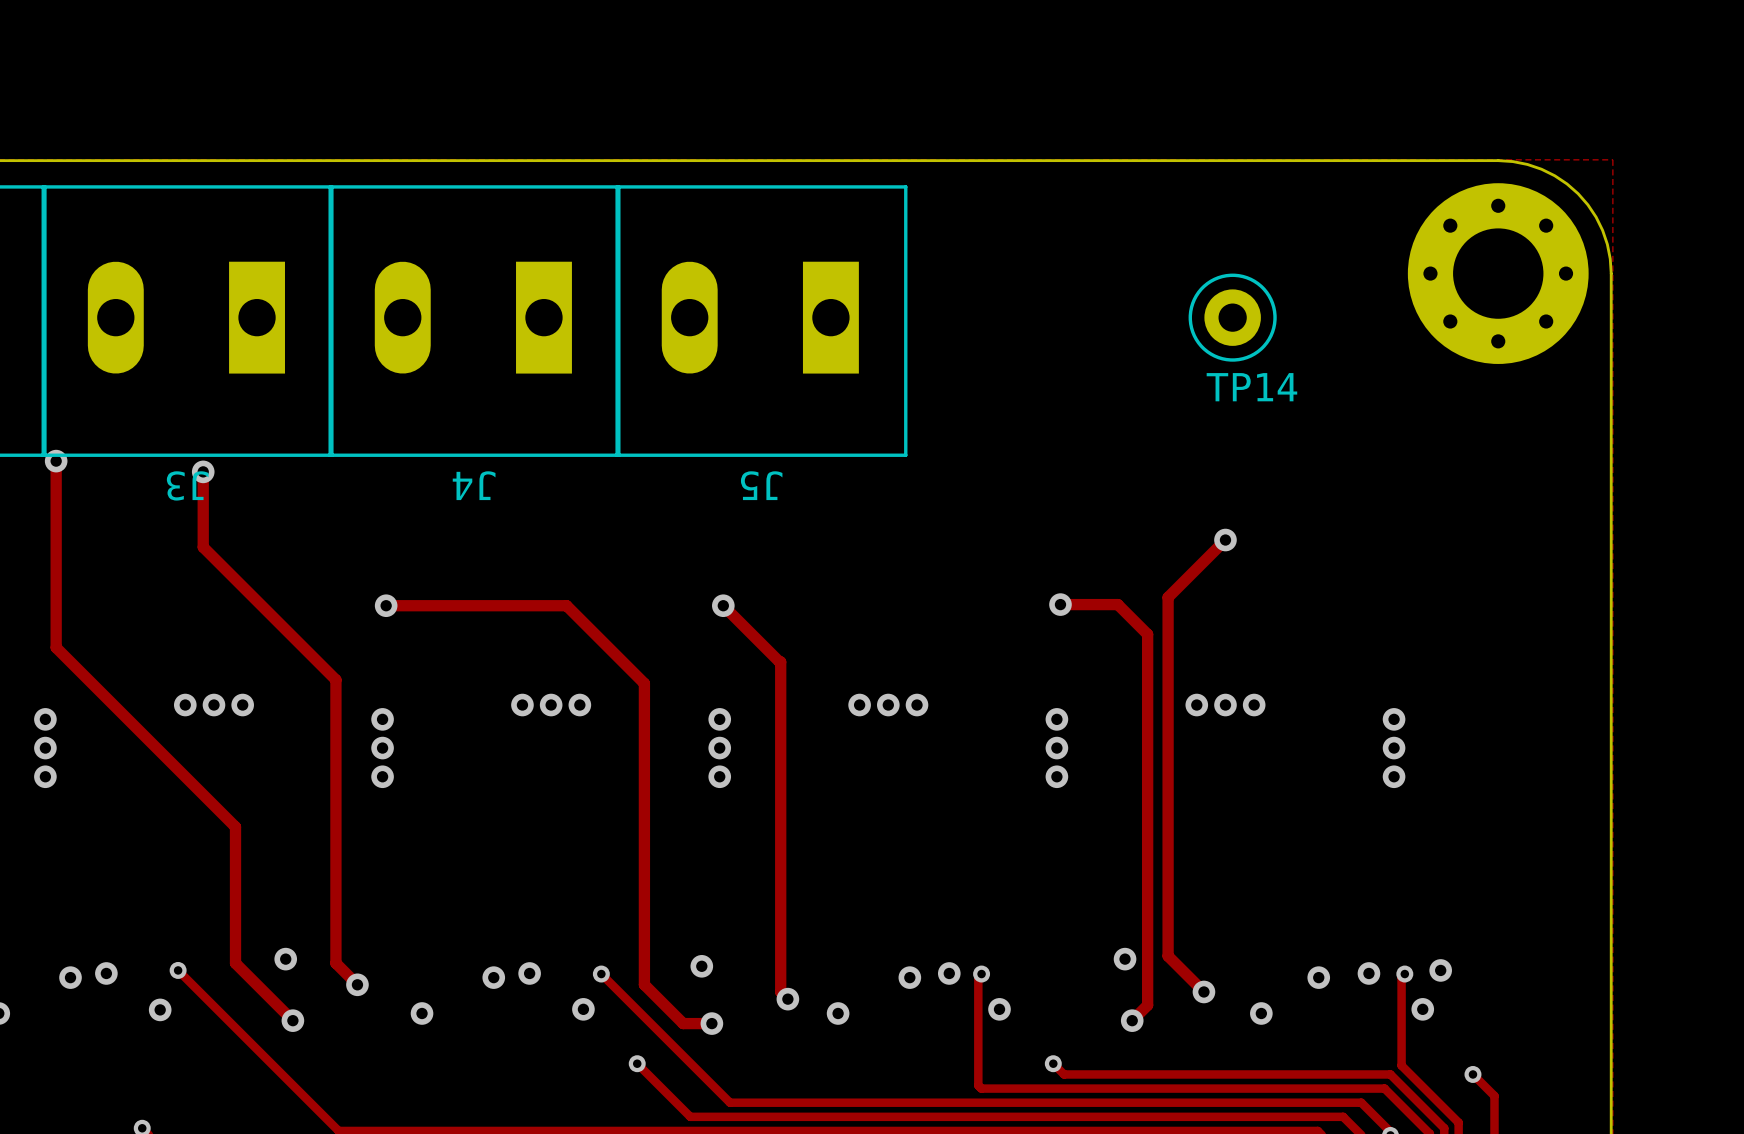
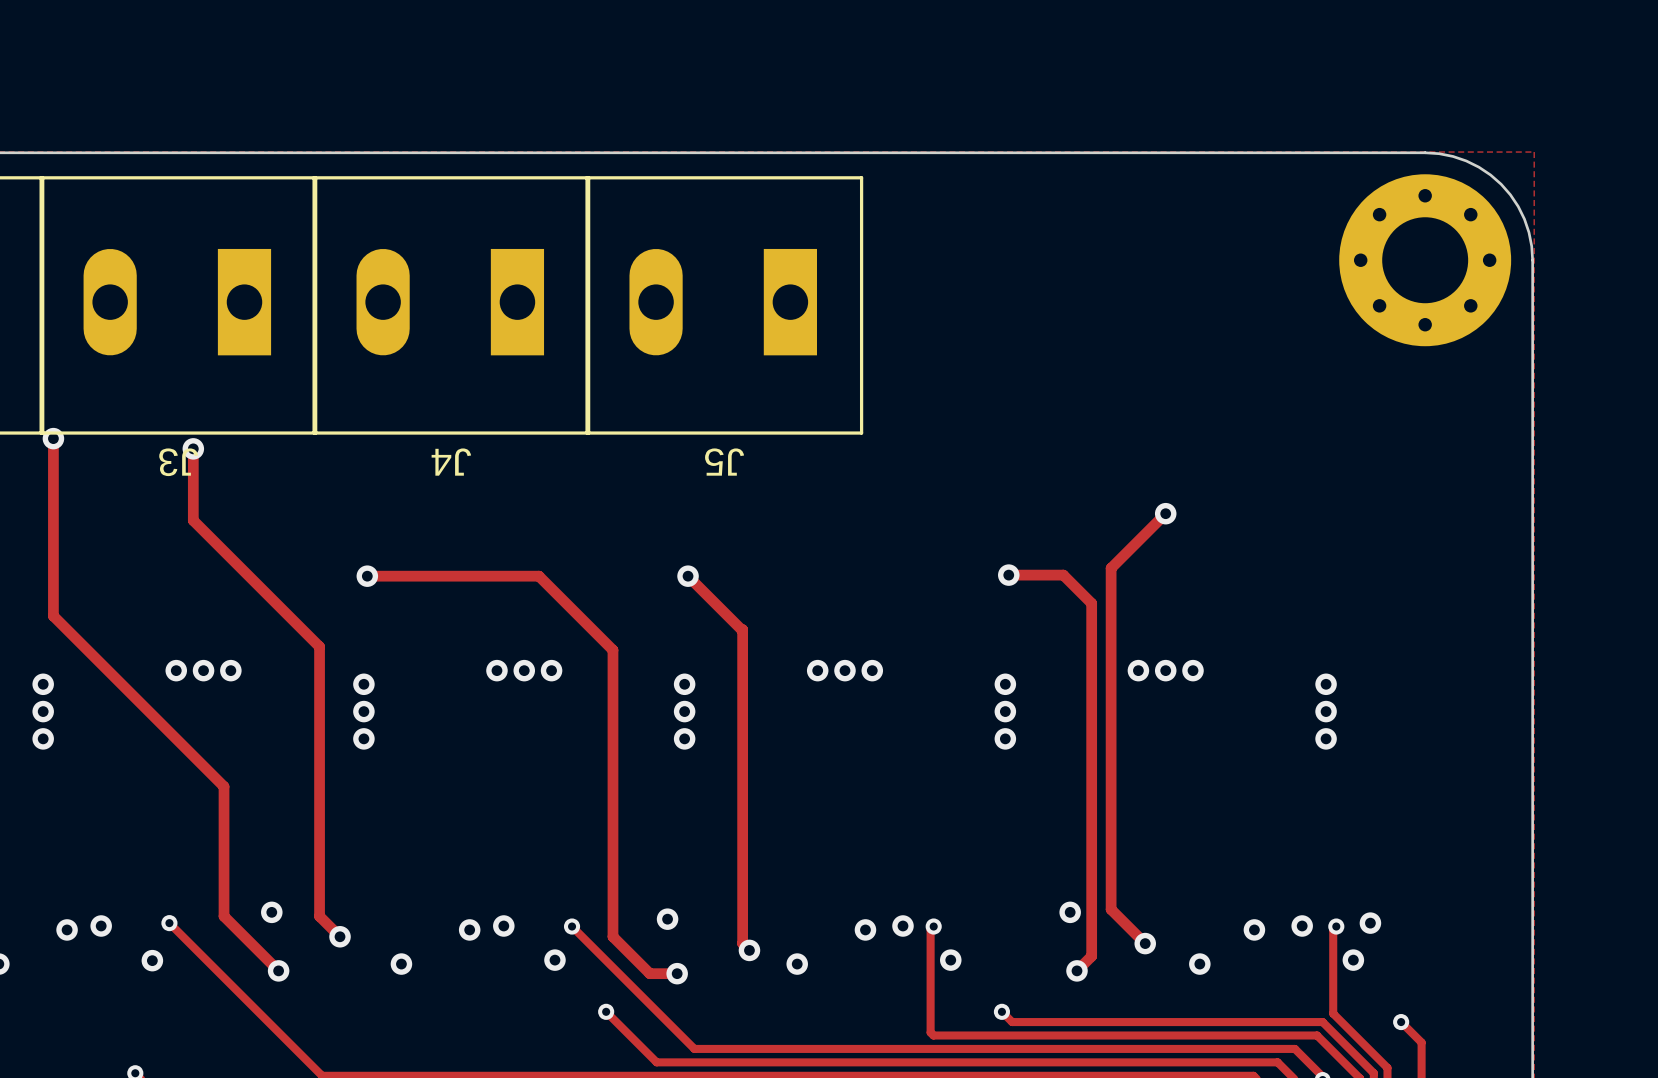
TP14: (1232, 317) -> none

